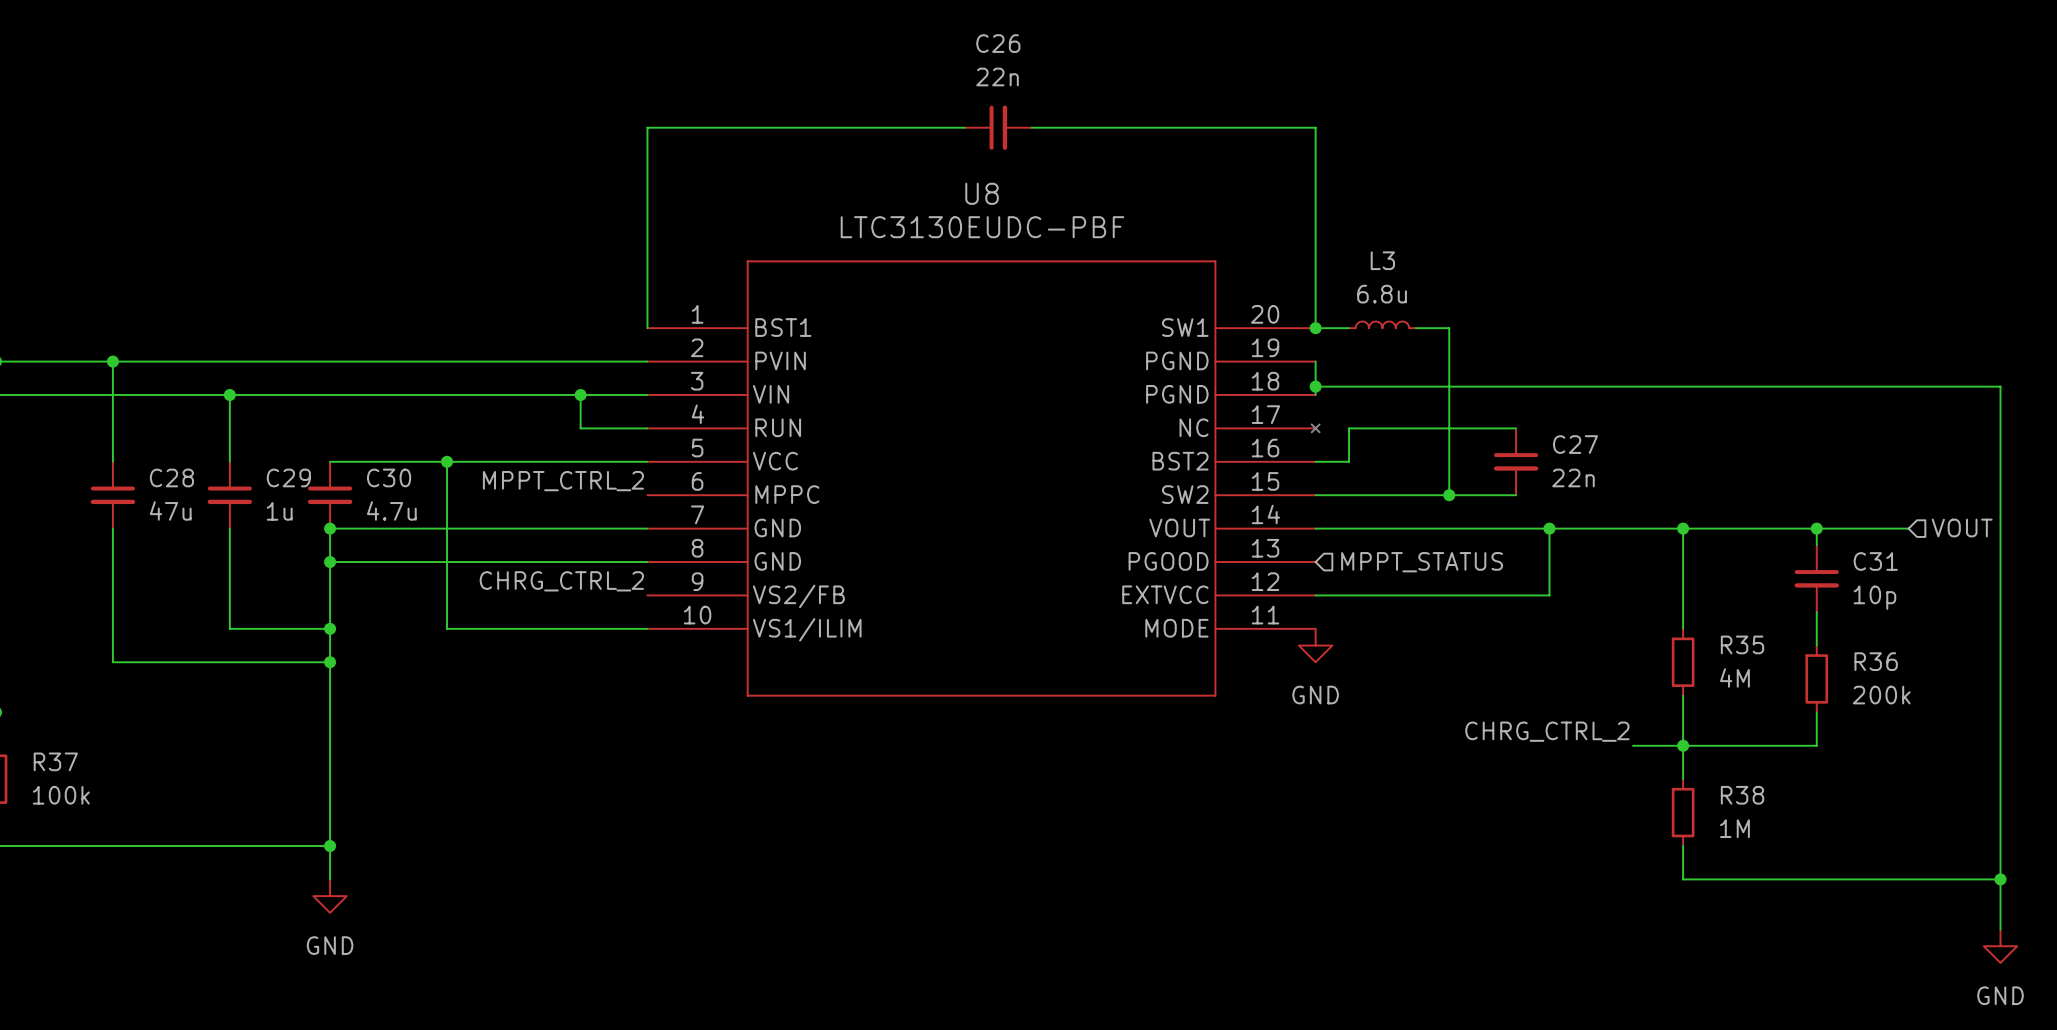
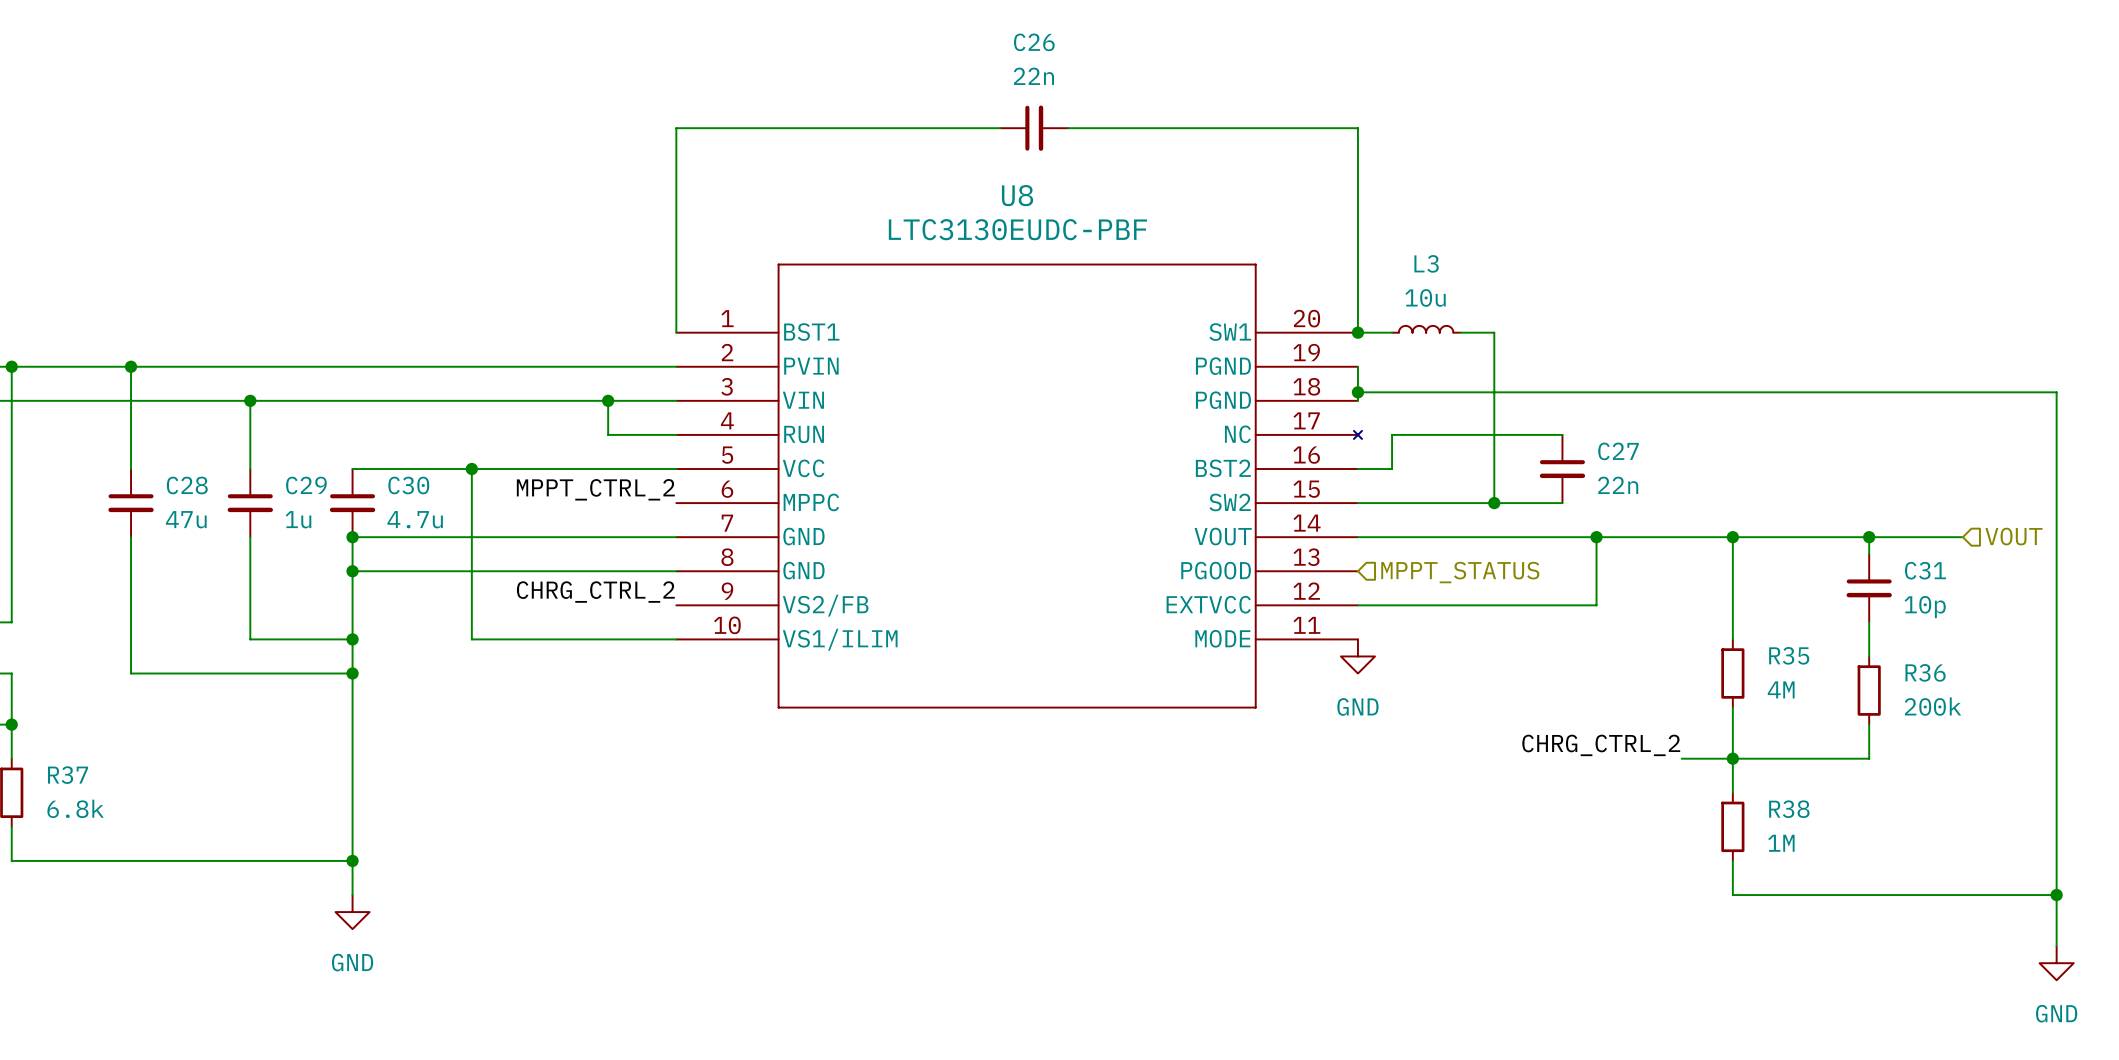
L3 value: 6.8u (1382, 294) -> 10u (1425, 297)
R37 value: 100k (61, 795) -> 6.8k (75, 808)

